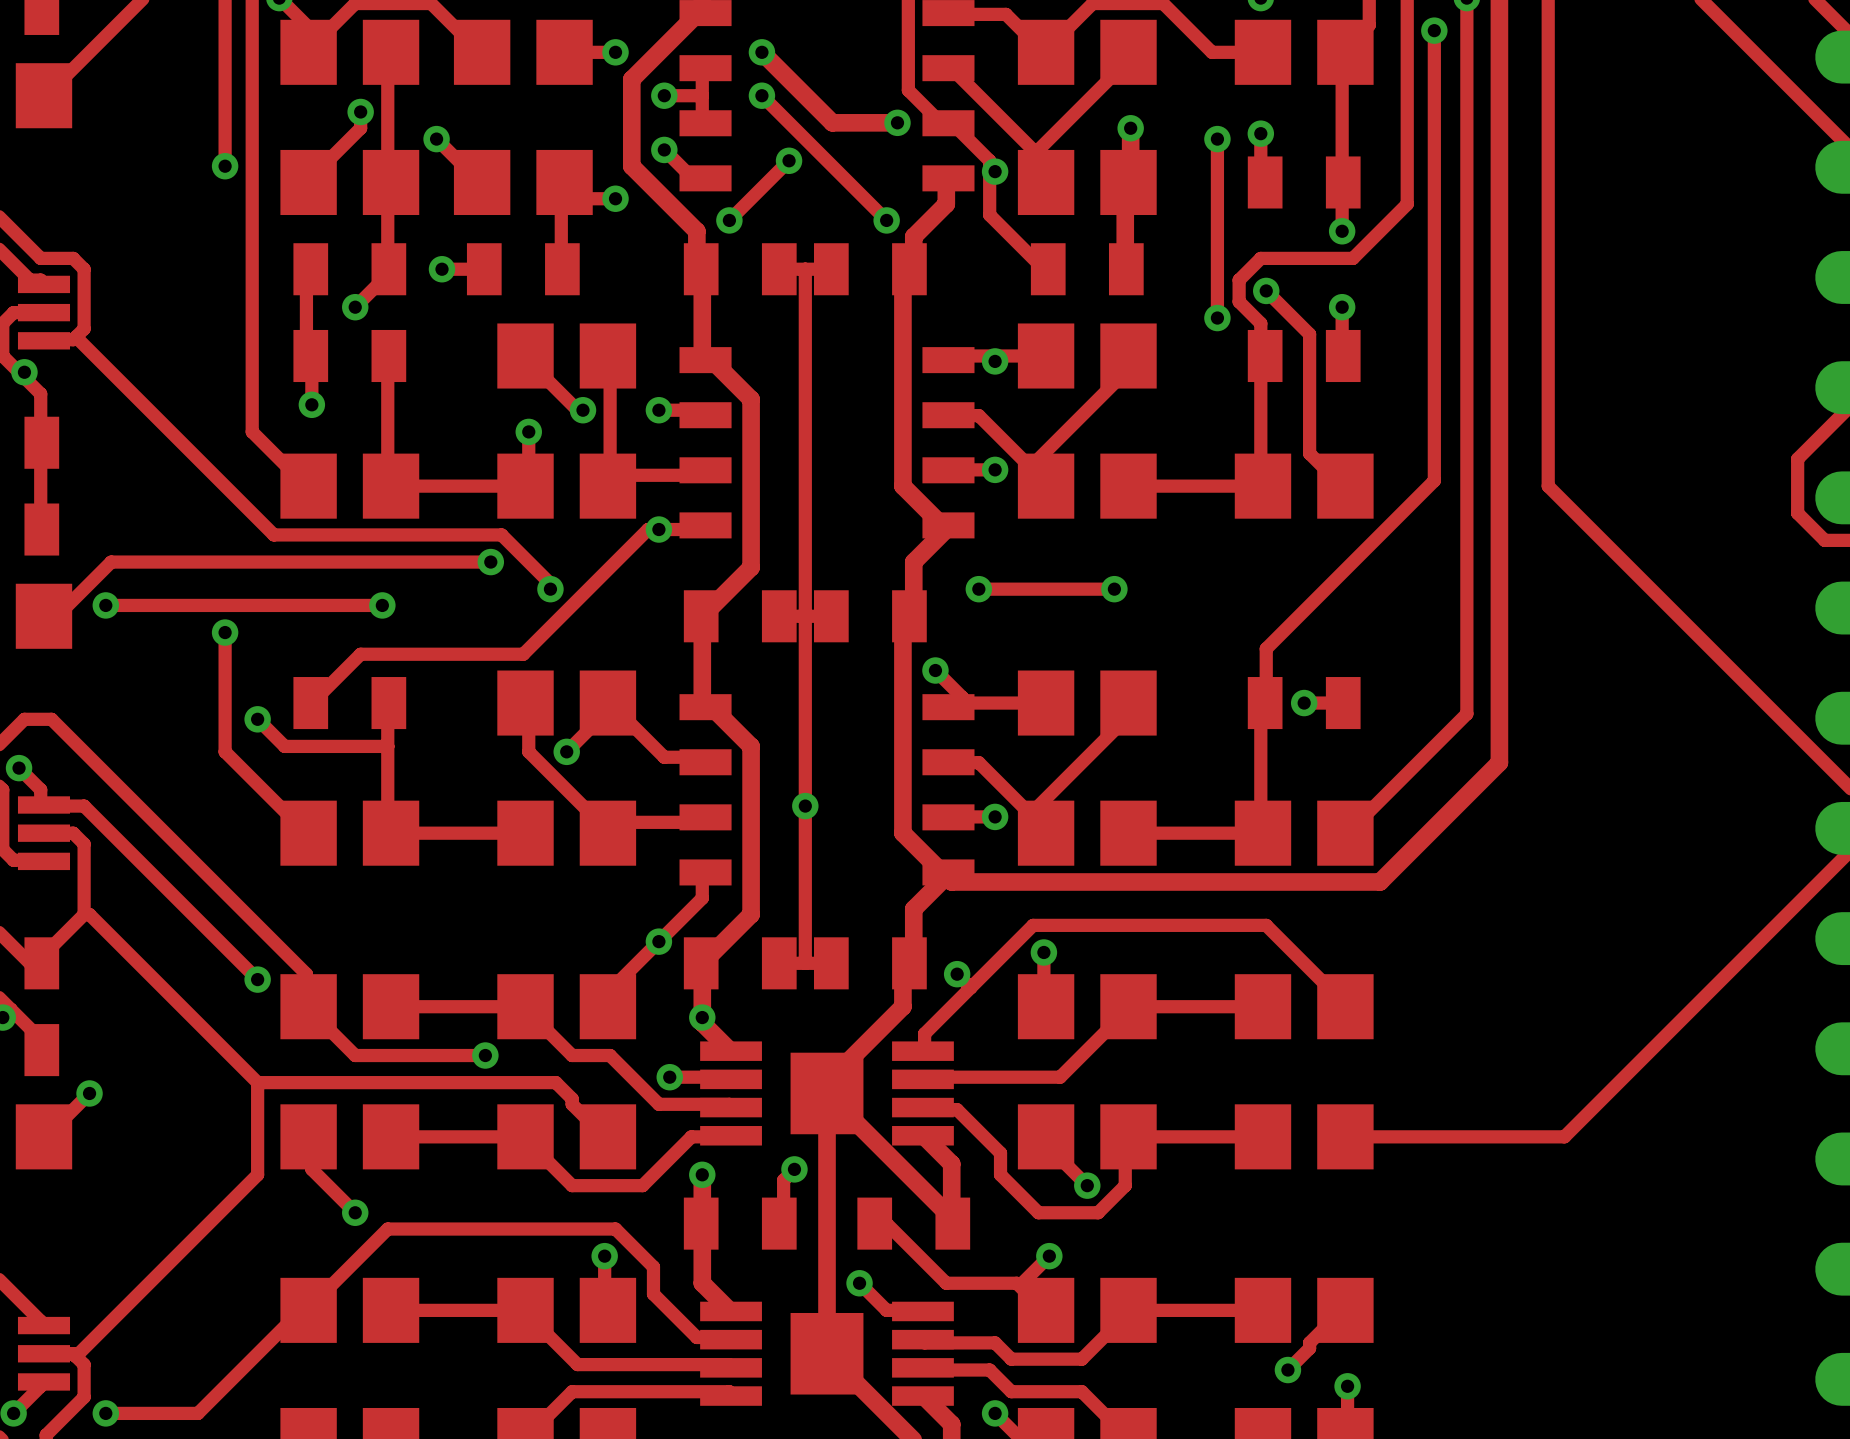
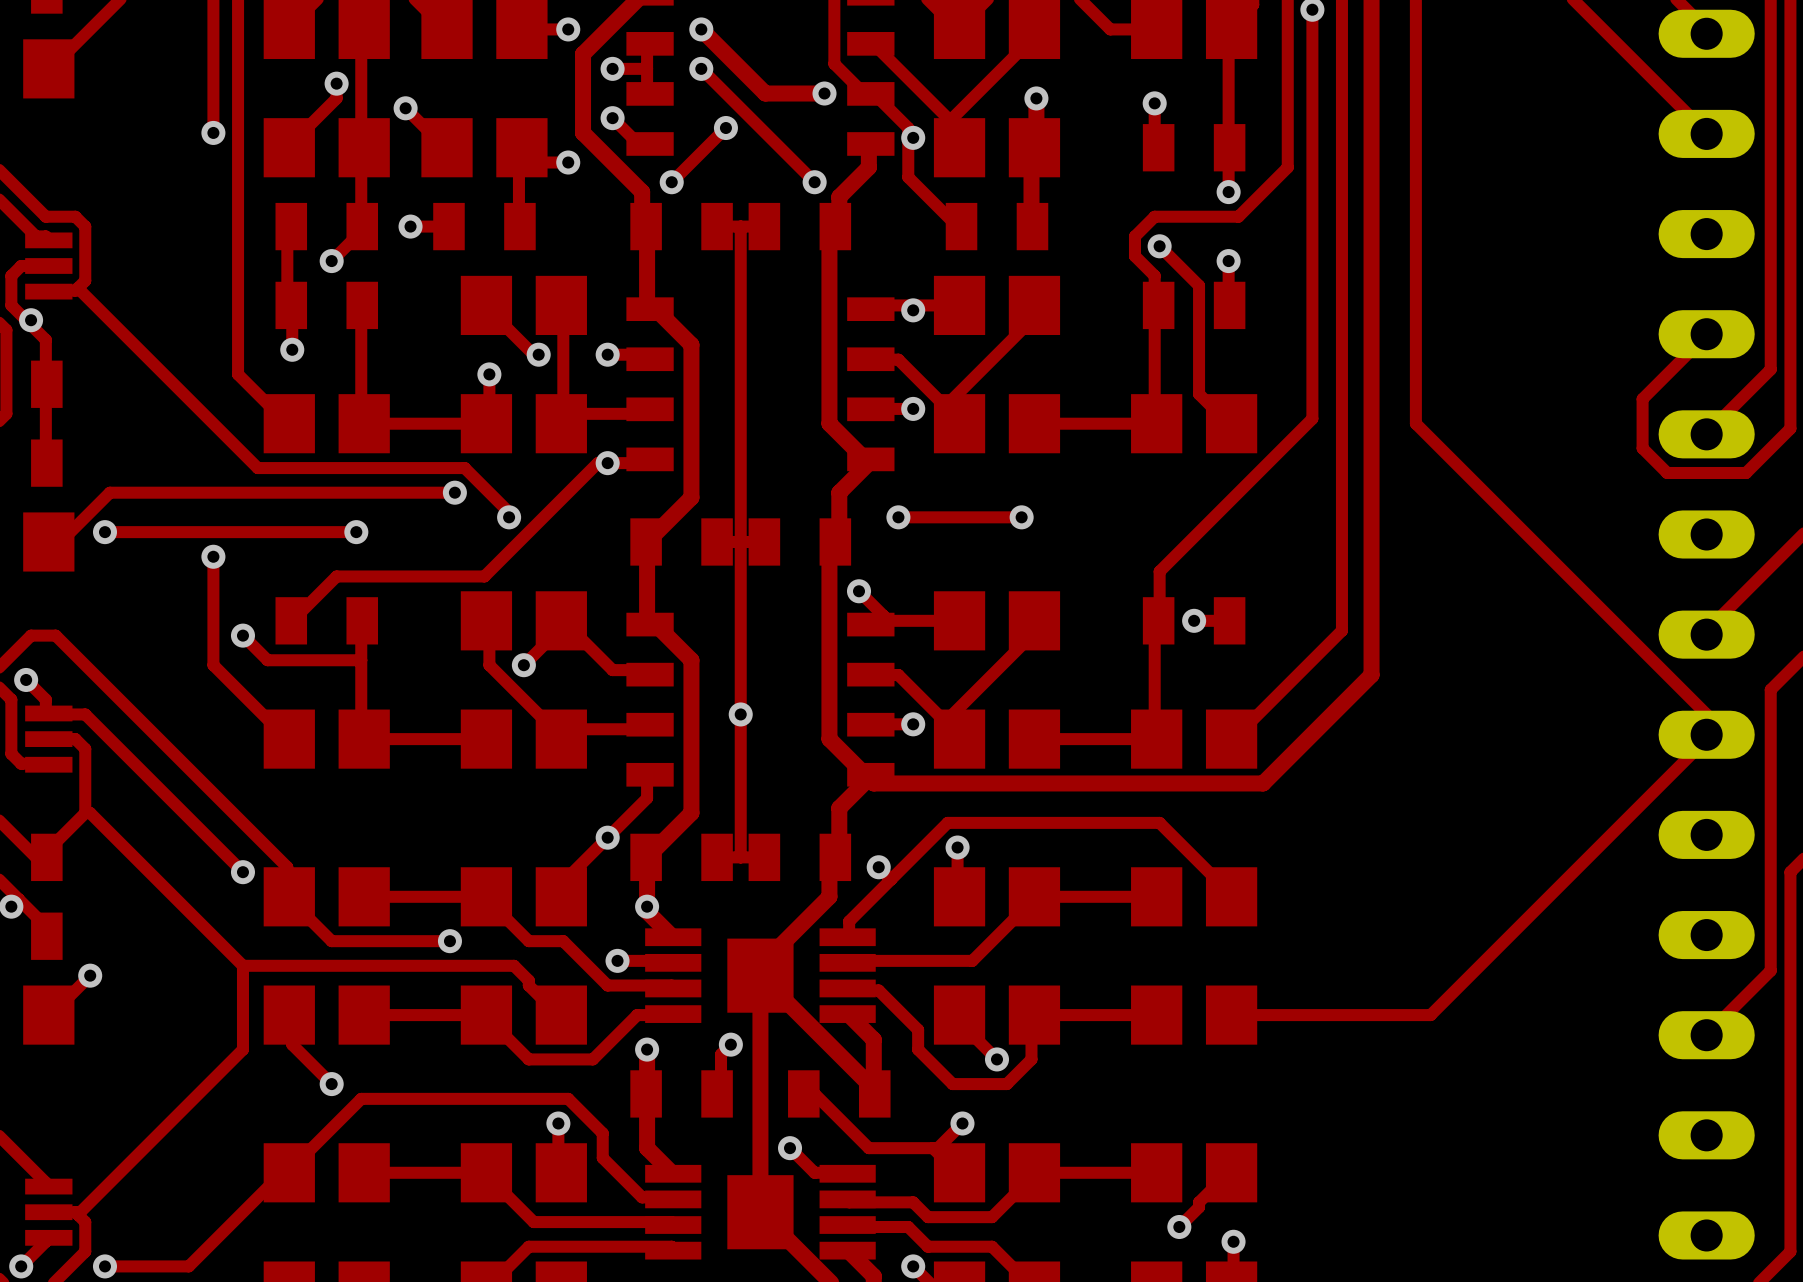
top track: (1217, 139) (1217, 318) -> none
via: (1217, 139) -> none
via: (1217, 318) -> none

